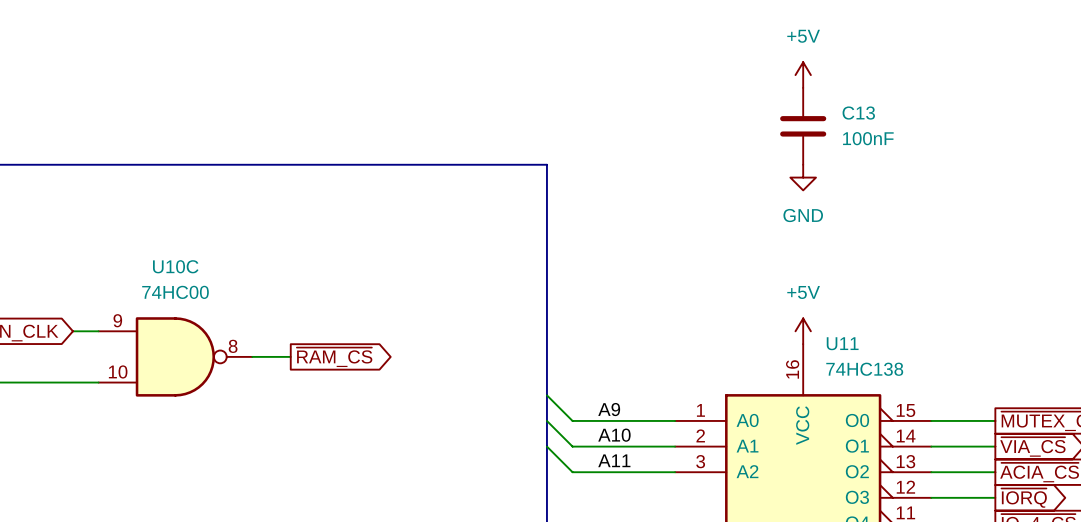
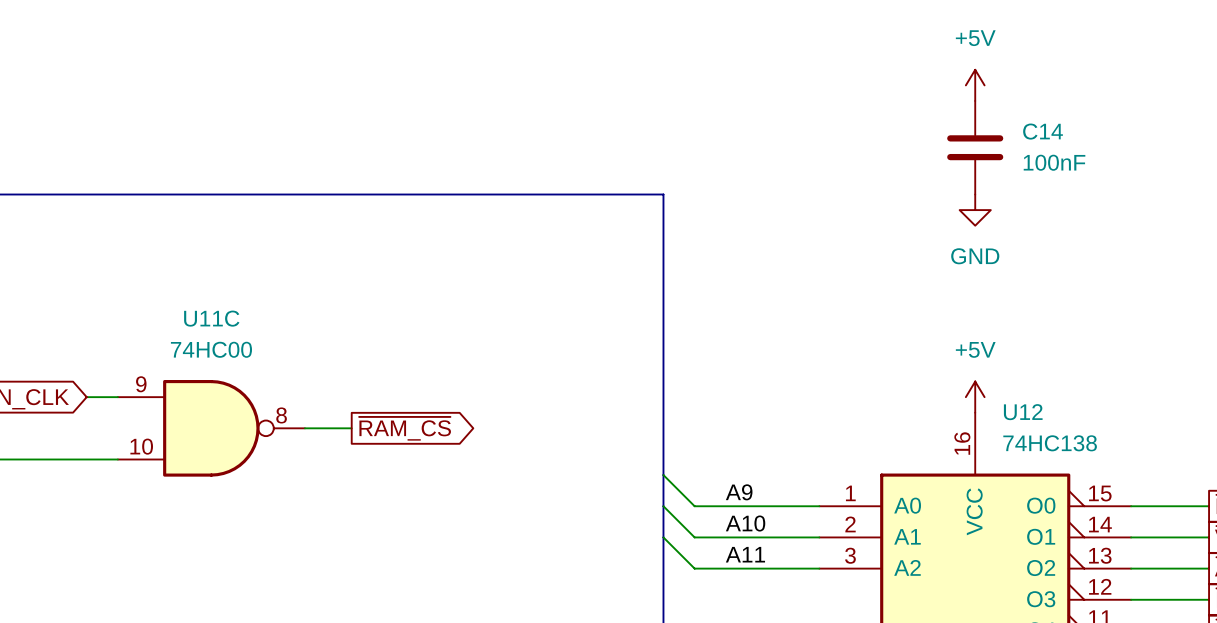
C13 name: C13 (858, 113) -> C14 (1043, 131)
U10C name: U10C (175, 266) -> U11C (211, 318)
U11 name: U11 (842, 343) -> U12 (1023, 412)

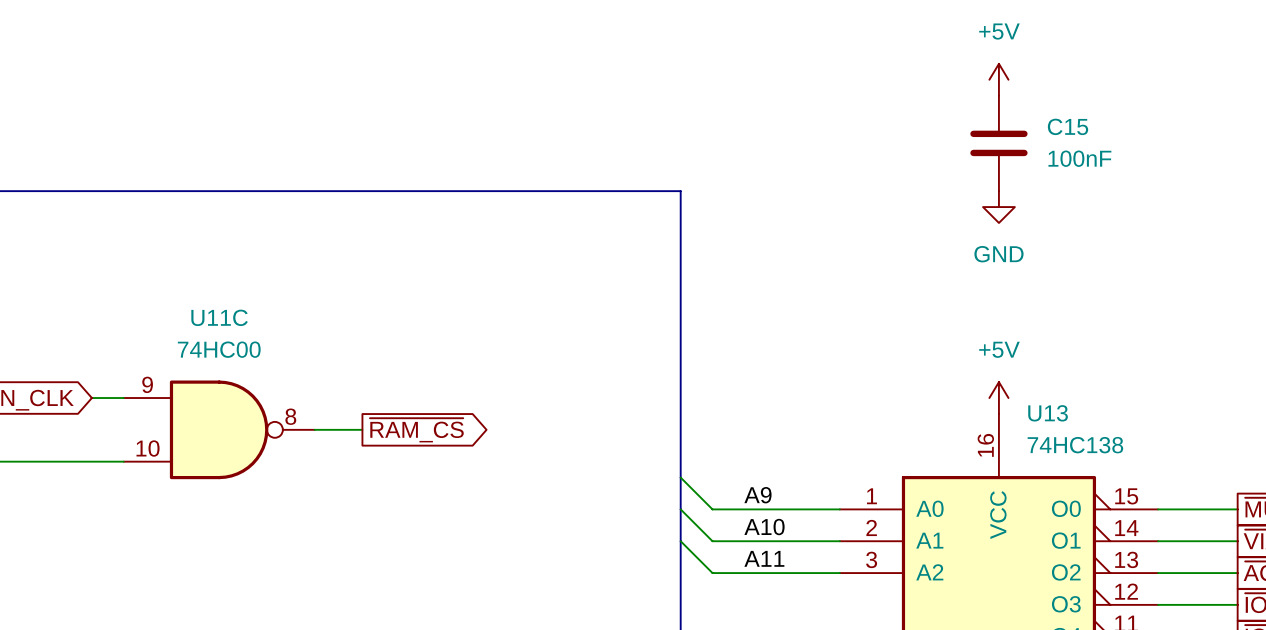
C14 name: C14 (1043, 131) -> C15 (1068, 126)
U12 name: U12 (1023, 412) -> U13 (1048, 413)

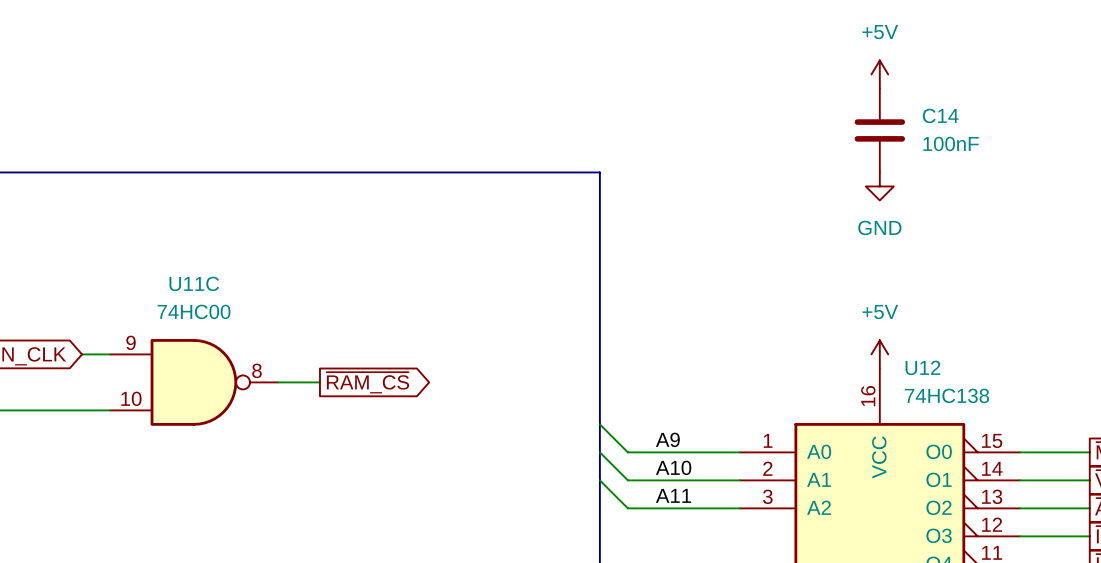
C15 name: C15 (1068, 126) -> C14 (940, 115)
U13 name: U13 (1048, 413) -> U12 (922, 367)

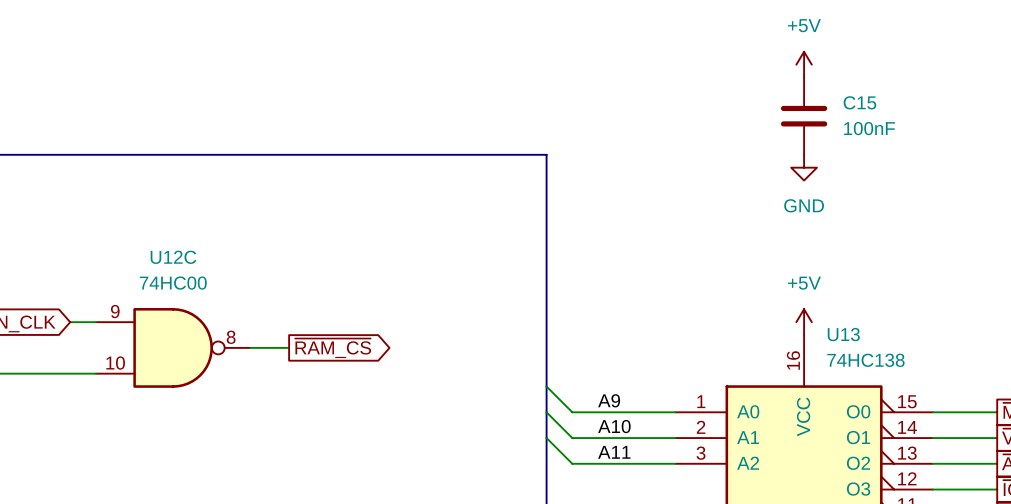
C14 name: C14 (940, 115) -> C15 (859, 102)
U11C name: U11C (194, 283) -> U12C (173, 257)
U12 name: U12 (922, 367) -> U13 (843, 334)

